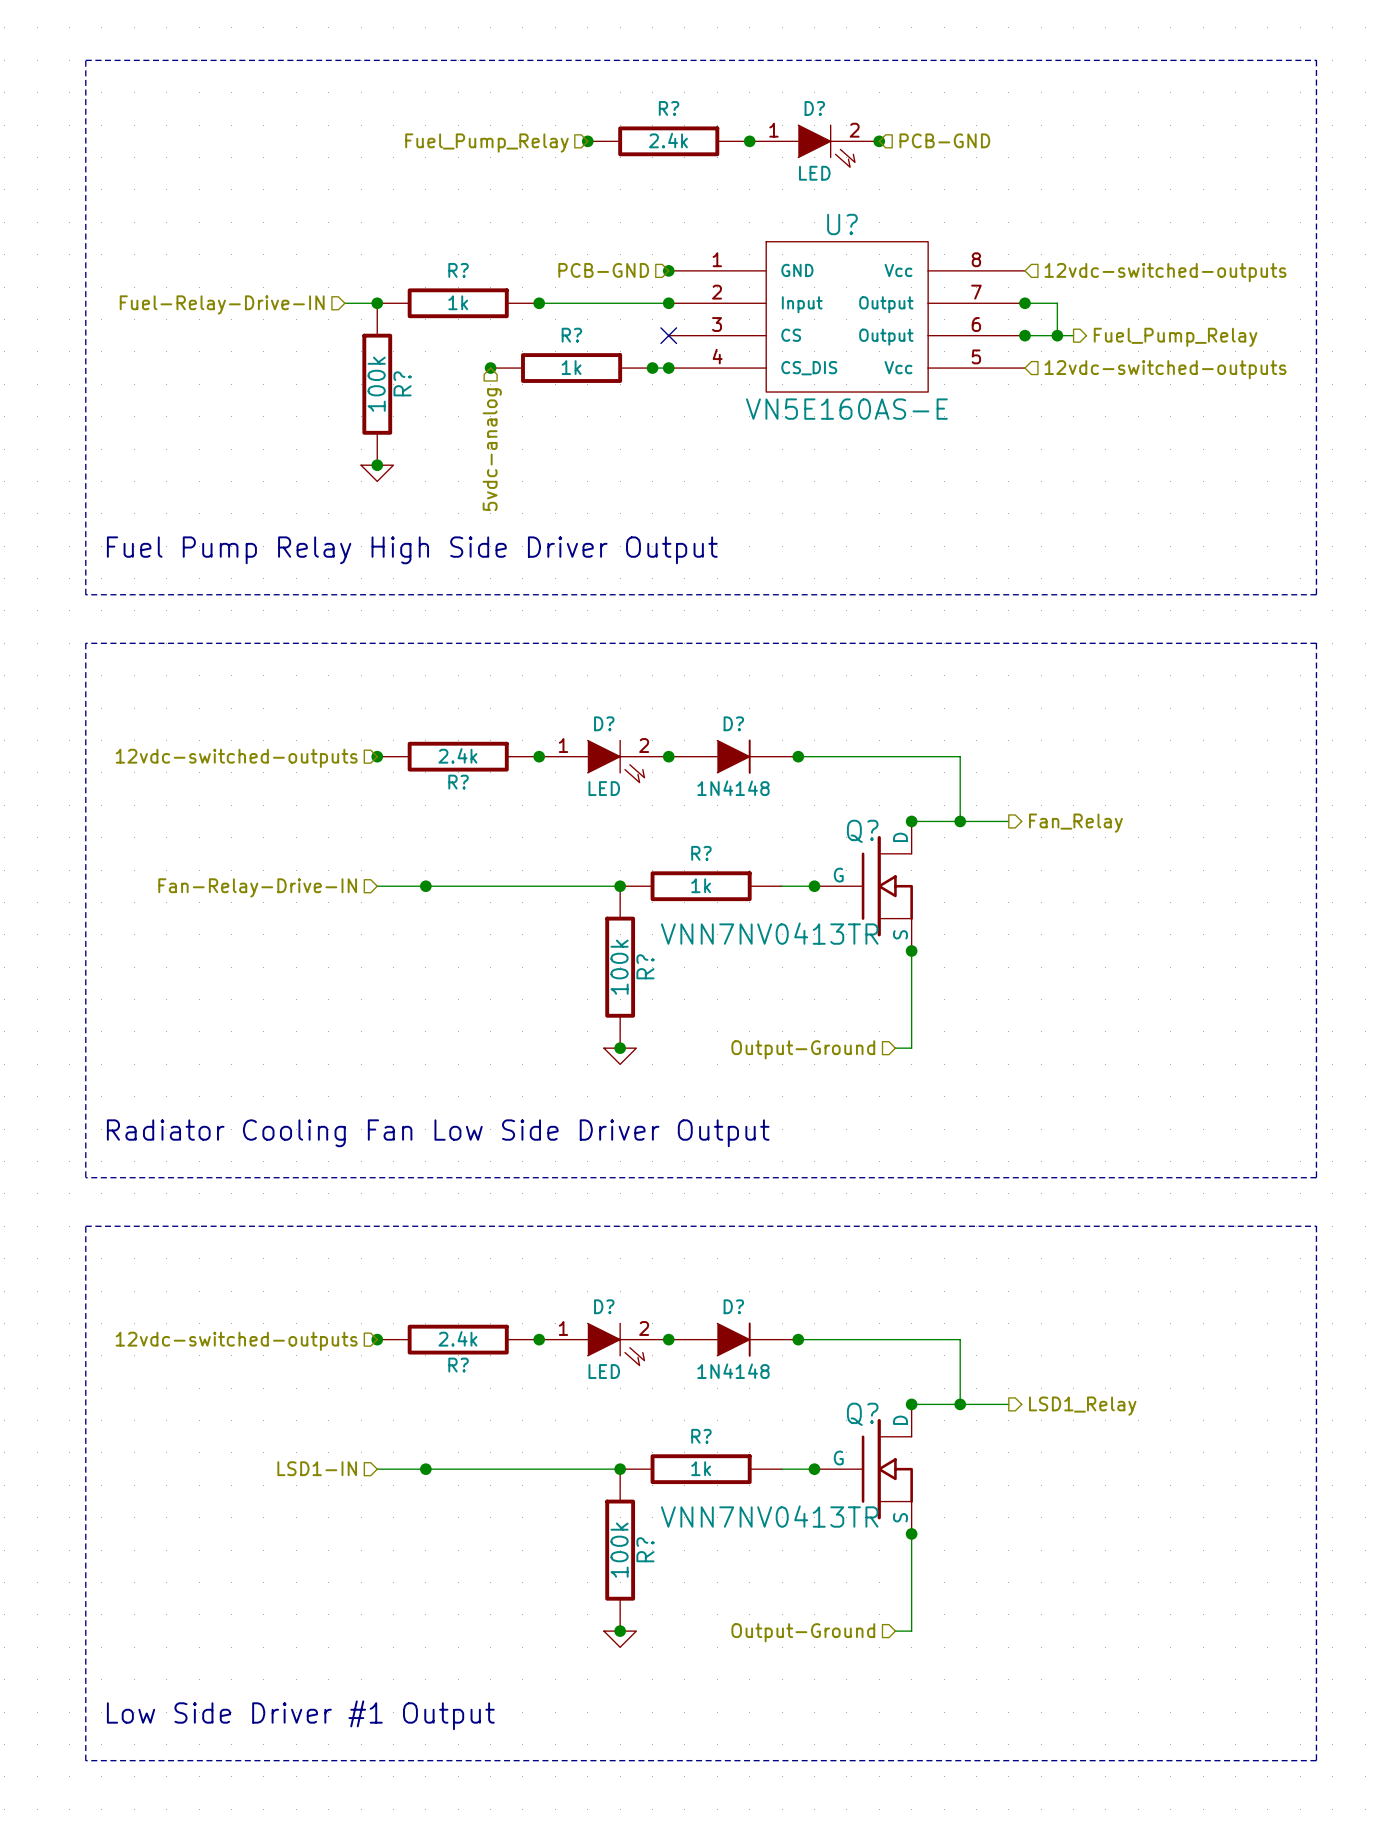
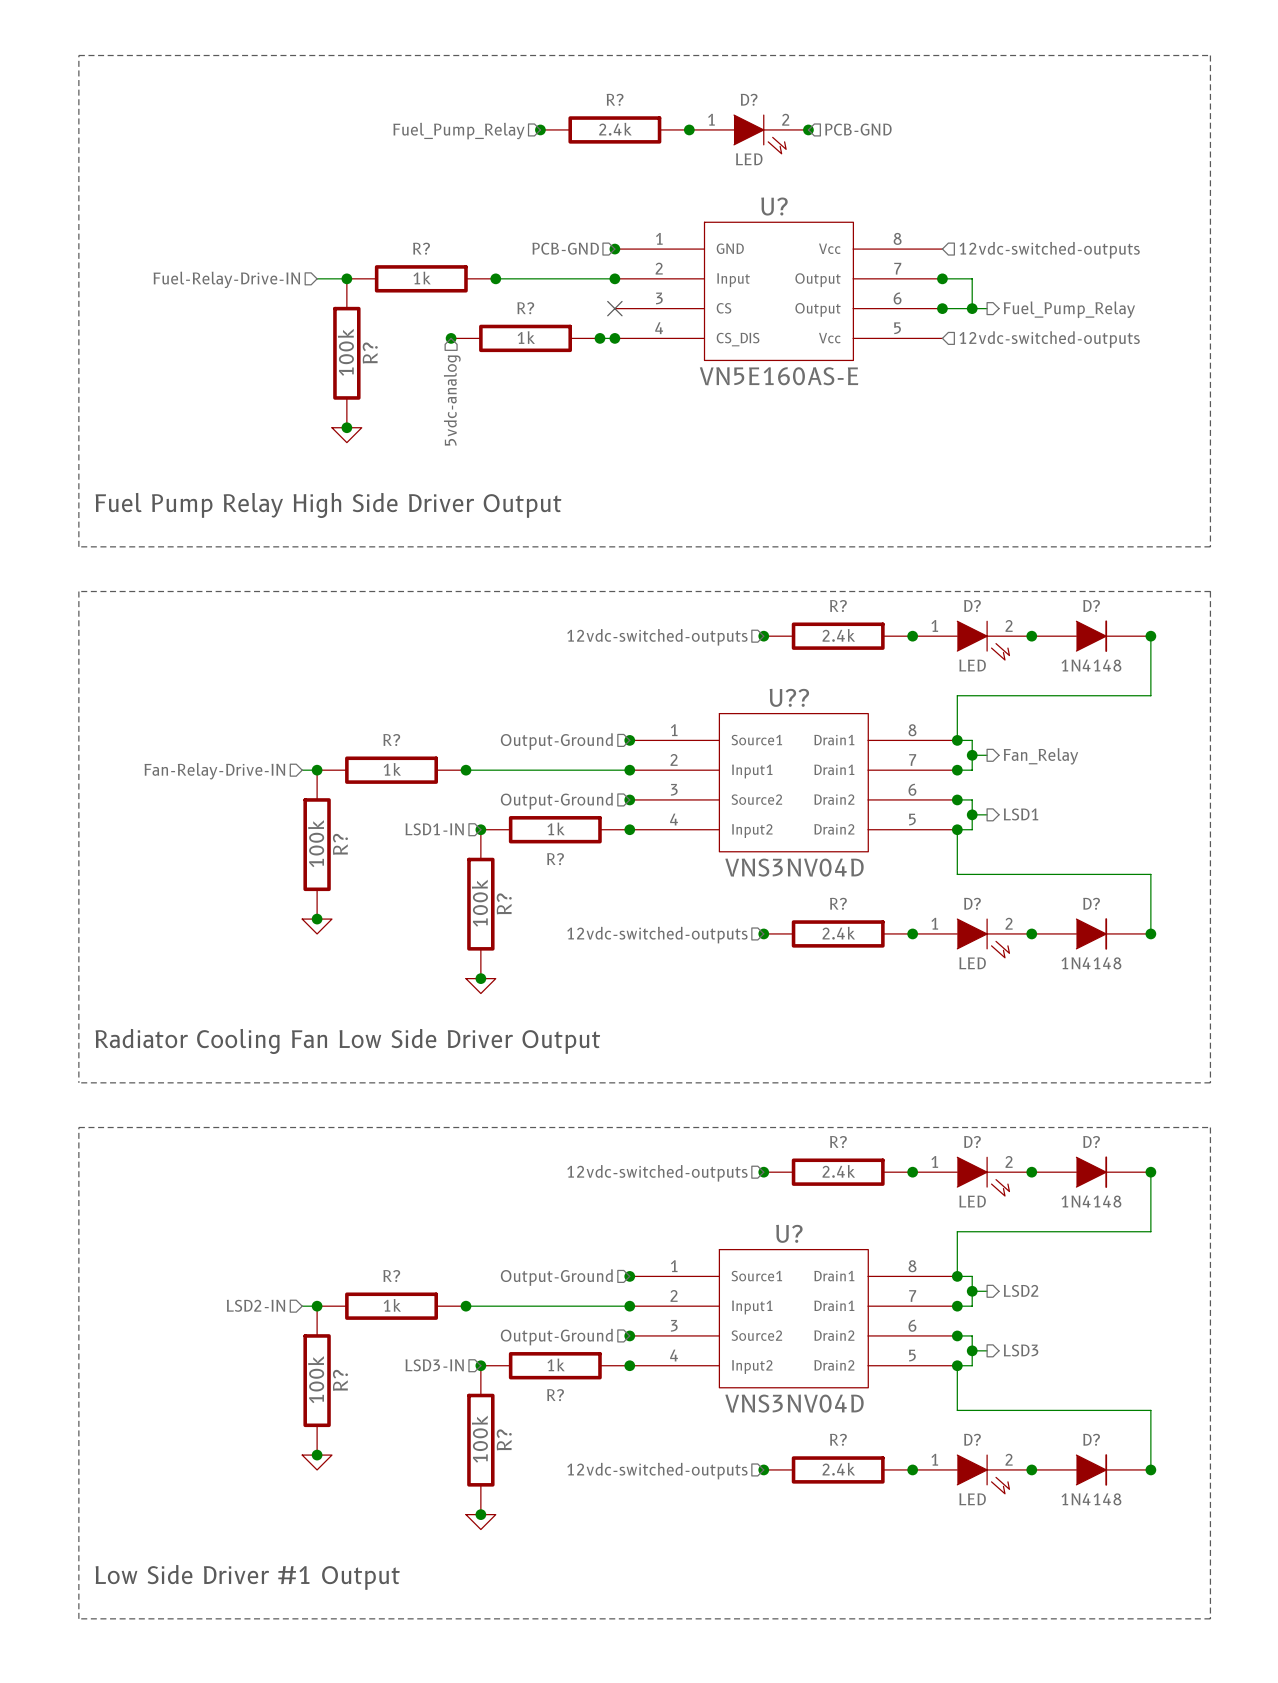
junction: none -> (763, 636)
R?: none -> 2.4k (838, 636)
junction: none -> (912, 636)
junction: none -> (1031, 636)
D?: none -> 1N4148 (1091, 636)
wire: none -> (1150, 636) (1150, 695) (957, 695) (957, 740) (972, 740) (972, 770) (957, 770)
junction: none -> (1150, 636)
hierarchical label: none -> 12vdc-switched-outputs (657, 637)
D?: none -> LED (972, 640)
junction: (377, 756) -> none
R?: 2.4k (458, 756) -> none
junction: (539, 756) -> none
junction: (668, 756) -> none
D?: 1N4148 (733, 756) -> none
wire: (798, 756) (960, 756) (960, 821) -> none
junction: (798, 756) -> none
hierarchical label: 12vdc-switched-outputs (236, 758) -> none
D?: LED (603, 761) -> none
junction: none -> (629, 740)
junction: none -> (957, 740)
hierarchical label: none -> Output-Ground (556, 741)
wire: (911, 821) (1008, 821) -> none
junction: (911, 821) -> none
junction: (960, 821) -> none
wire: none -> (972, 755) (987, 755)
junction: none -> (972, 755)
hierarchical label position: Fan_Relay (1075, 823) -> Fan_Relay (1041, 756)
wire: none -> (302, 770) (317, 770)
junction: none -> (317, 770)
R?: none -> 1k (391, 770)
wire: none -> (465, 770) (629, 770)
junction: none -> (465, 770)
junction: none -> (629, 770)
junction: none -> (957, 770)
U??: none -> VNS3NV04D (793, 782)
R? name position: R? (701, 853) -> R? (555, 859)
junction: none -> (629, 799)
wire: none -> (957, 799) (972, 799) (972, 829) (957, 829) (957, 874) (1150, 874) (1150, 933)
junction: none -> (957, 799)
hierarchical label: none -> Output-Ground (556, 801)
hierarchical label: none -> LSD1 (1021, 814)
wire: (377, 886) (620, 886) -> none
junction: (425, 886) -> none
junction: (620, 886) -> none
R? position: (701, 886) -> (555, 829)
wire: (782, 886) (814, 886) -> none
junction: (814, 886) -> none
Q?: VNN7NV0413TR (863, 886) -> none
wire: none -> (972, 814) (987, 814)
junction: none -> (972, 814)
hierarchical label position: Fan-Relay-Drive-IN (257, 887) -> Fan-Relay-Drive-IN (214, 771)
hierarchical label: none -> LSD1-IN (434, 829)
junction: none -> (480, 829)
junction: none -> (629, 829)
junction: none -> (957, 829)
R?: none -> 100k (317, 844)
wire: (911, 950) (911, 1048) (895, 1048) -> none
junction: (911, 950) -> none
R? position: (620, 967) -> (480, 904)
junction: none -> (317, 919)
power symbol: none -> (317, 926)
junction: none -> (763, 933)
R?: none -> 2.4k (838, 933)
junction: none -> (912, 933)
junction: none -> (1031, 933)
D?: none -> 1N4148 (1091, 933)
junction: none -> (1150, 933)
hierarchical label: none -> 12vdc-switched-outputs (657, 935)
D?: none -> LED (972, 938)
junction: (620, 1048) -> none
hierarchical label: Output-Ground (803, 1049) -> none
power symbol position: (620, 1056) -> (480, 986)
junction: none -> (480, 978)
junction: none -> (763, 1172)
R?: none -> 2.4k (838, 1172)
junction: none -> (912, 1172)
junction: none -> (1031, 1172)
D?: none -> 1N4148 (1091, 1172)
wire: none -> (1150, 1172) (1150, 1231) (957, 1231) (957, 1276) (972, 1276) (972, 1306) (957, 1306)
junction: none -> (1150, 1172)
hierarchical label: none -> 12vdc-switched-outputs (657, 1173)
D?: none -> LED (972, 1176)
junction: (377, 1339) -> none
R?: 2.4k (458, 1339) -> none
junction: (539, 1339) -> none
junction: (668, 1339) -> none
D?: 1N4148 (733, 1339) -> none
wire: (798, 1339) (960, 1339) (960, 1404) -> none
junction: (798, 1339) -> none
hierarchical label: 12vdc-switched-outputs (236, 1341) -> none
D?: LED (603, 1344) -> none
junction: none -> (629, 1276)
junction: none -> (957, 1276)
hierarchical label: none -> Output-Ground (556, 1277)
hierarchical label: none -> LSD2 (1021, 1290)
wire: (911, 1404) (1008, 1404) -> none
junction: (911, 1404) -> none
junction: (960, 1404) -> none
wire: none -> (972, 1291) (987, 1291)
junction: none -> (972, 1291)
hierarchical label: LSD1_Relay (1082, 1406) -> none
hierarchical label: none -> LSD2-IN (255, 1305)
wire: none -> (302, 1306) (317, 1306)
junction: none -> (317, 1306)
R?: none -> 1k (391, 1306)
wire: none -> (465, 1306) (629, 1306)
junction: none -> (465, 1306)
junction: none -> (629, 1306)
junction: none -> (957, 1306)
U?: none -> VNS3NV04D (793, 1318)
R? name position: R? (701, 1436) -> R? (555, 1395)
junction: none -> (629, 1335)
wire: none -> (957, 1335) (972, 1335) (972, 1365) (957, 1365) (957, 1410) (1150, 1410) (1150, 1469)
junction: none -> (957, 1335)
hierarchical label: none -> Output-Ground (556, 1337)
hierarchical label: LSD1-IN (317, 1468) -> none
hierarchical label: none -> LSD3 (1021, 1350)
wire: (377, 1469) (620, 1469) -> none
junction: (425, 1469) -> none
junction: (620, 1469) -> none
R? position: (701, 1469) -> (555, 1365)
wire: (782, 1469) (814, 1469) -> none
junction: (814, 1469) -> none
Q?: VNN7NV0413TR (863, 1469) -> none
wire: none -> (972, 1350) (987, 1350)
junction: none -> (972, 1350)
hierarchical label: none -> LSD3-IN (434, 1365)
junction: none -> (480, 1365)
junction: none -> (629, 1365)
junction: none -> (957, 1365)
R?: none -> 100k (317, 1380)
wire: (911, 1533) (911, 1631) (895, 1631) -> none
junction: (911, 1533) -> none
R? position: (620, 1550) -> (480, 1440)
junction: none -> (317, 1455)
power symbol: none -> (317, 1462)
junction: none -> (763, 1469)
R?: none -> 2.4k (838, 1469)
junction: none -> (912, 1469)
junction: none -> (1031, 1469)
D?: none -> 1N4148 (1091, 1469)
junction: none -> (1150, 1469)
hierarchical label: none -> 12vdc-switched-outputs (657, 1471)
D?: none -> LED (972, 1474)
junction: (620, 1631) -> none
hierarchical label: Output-Ground (803, 1632) -> none
power symbol position: (620, 1639) -> (480, 1522)
junction: none -> (480, 1514)

